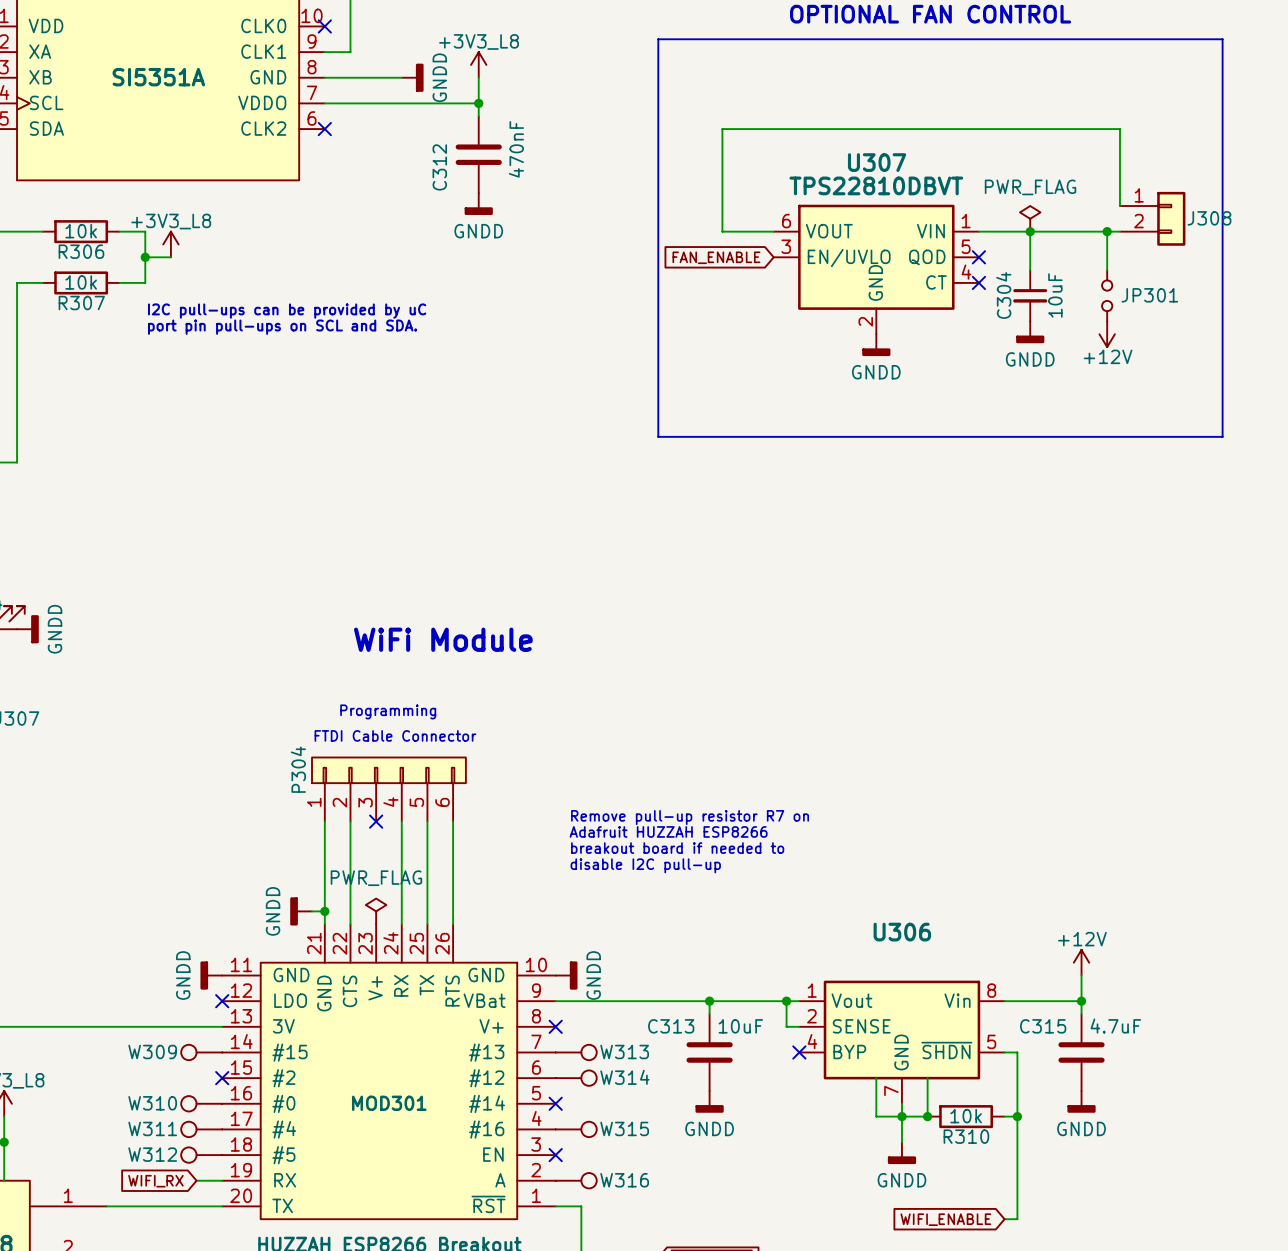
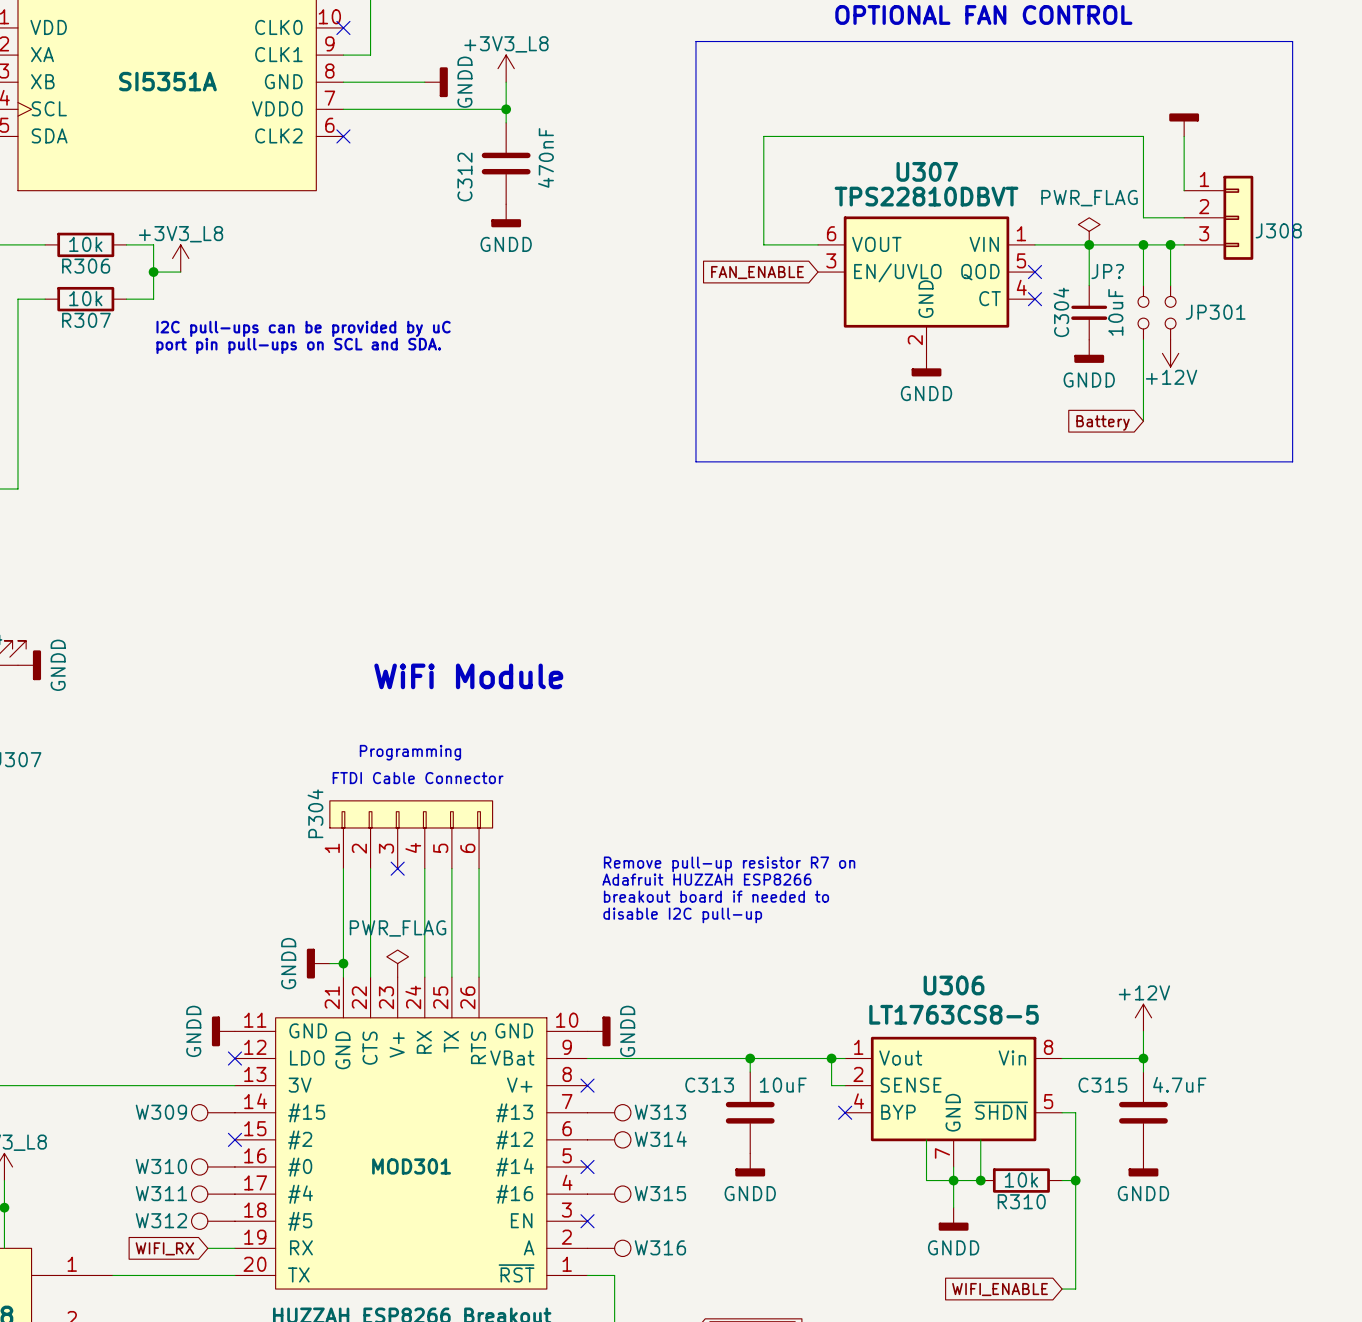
power symbol: none -> (1184, 124)
wire: (1081, 129) (1120, 129) -> none
wire: (1120, 180) (1120, 206) -> (1143, 136) (1143, 217) (1184, 217)
J308 symbol: [1120, 191, 1186, 246] -> [1184, 175, 1254, 260]
wire: none -> (1143, 244) (1143, 285)
junction: none -> (1143, 244)
JP?: none -> (1143, 312)
wire: none -> (1143, 339) (1143, 421)
global label: none -> Battery (1103, 422)
U306 value: none -> LT1763CS8-5 (954, 1014)

